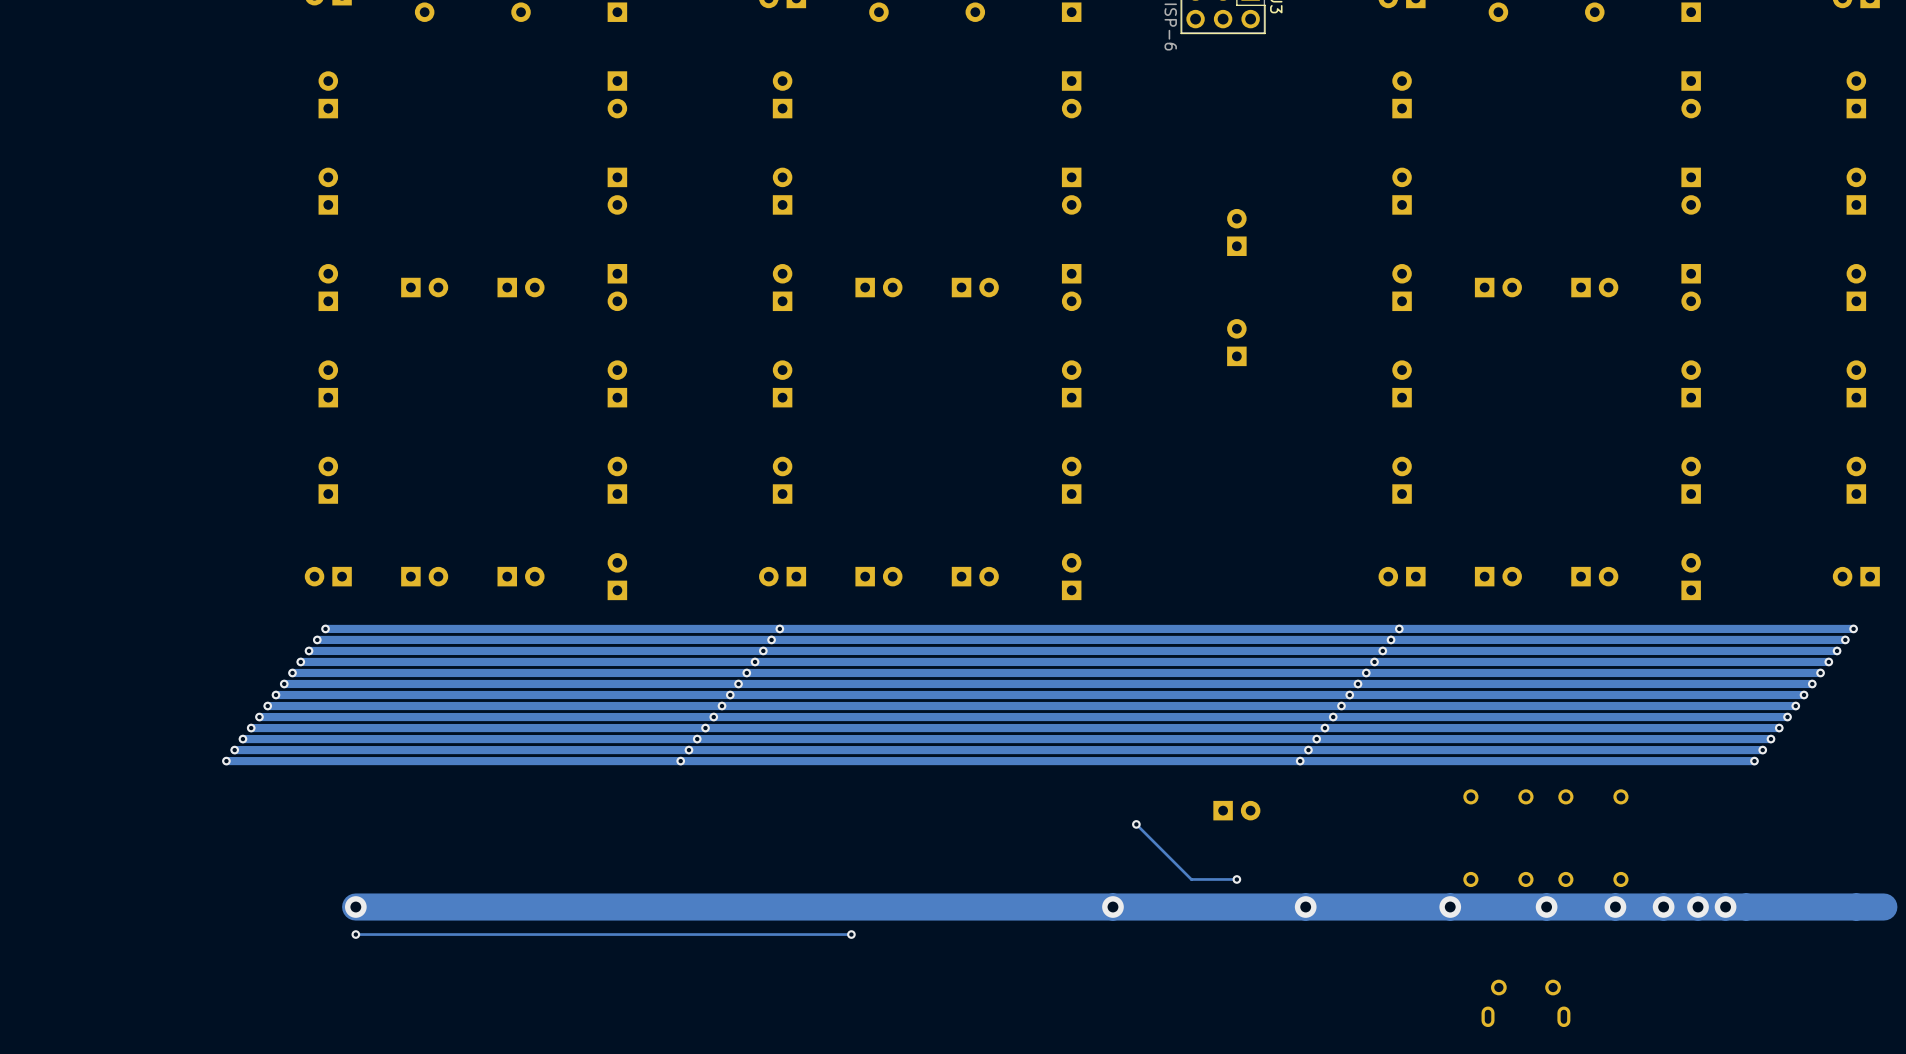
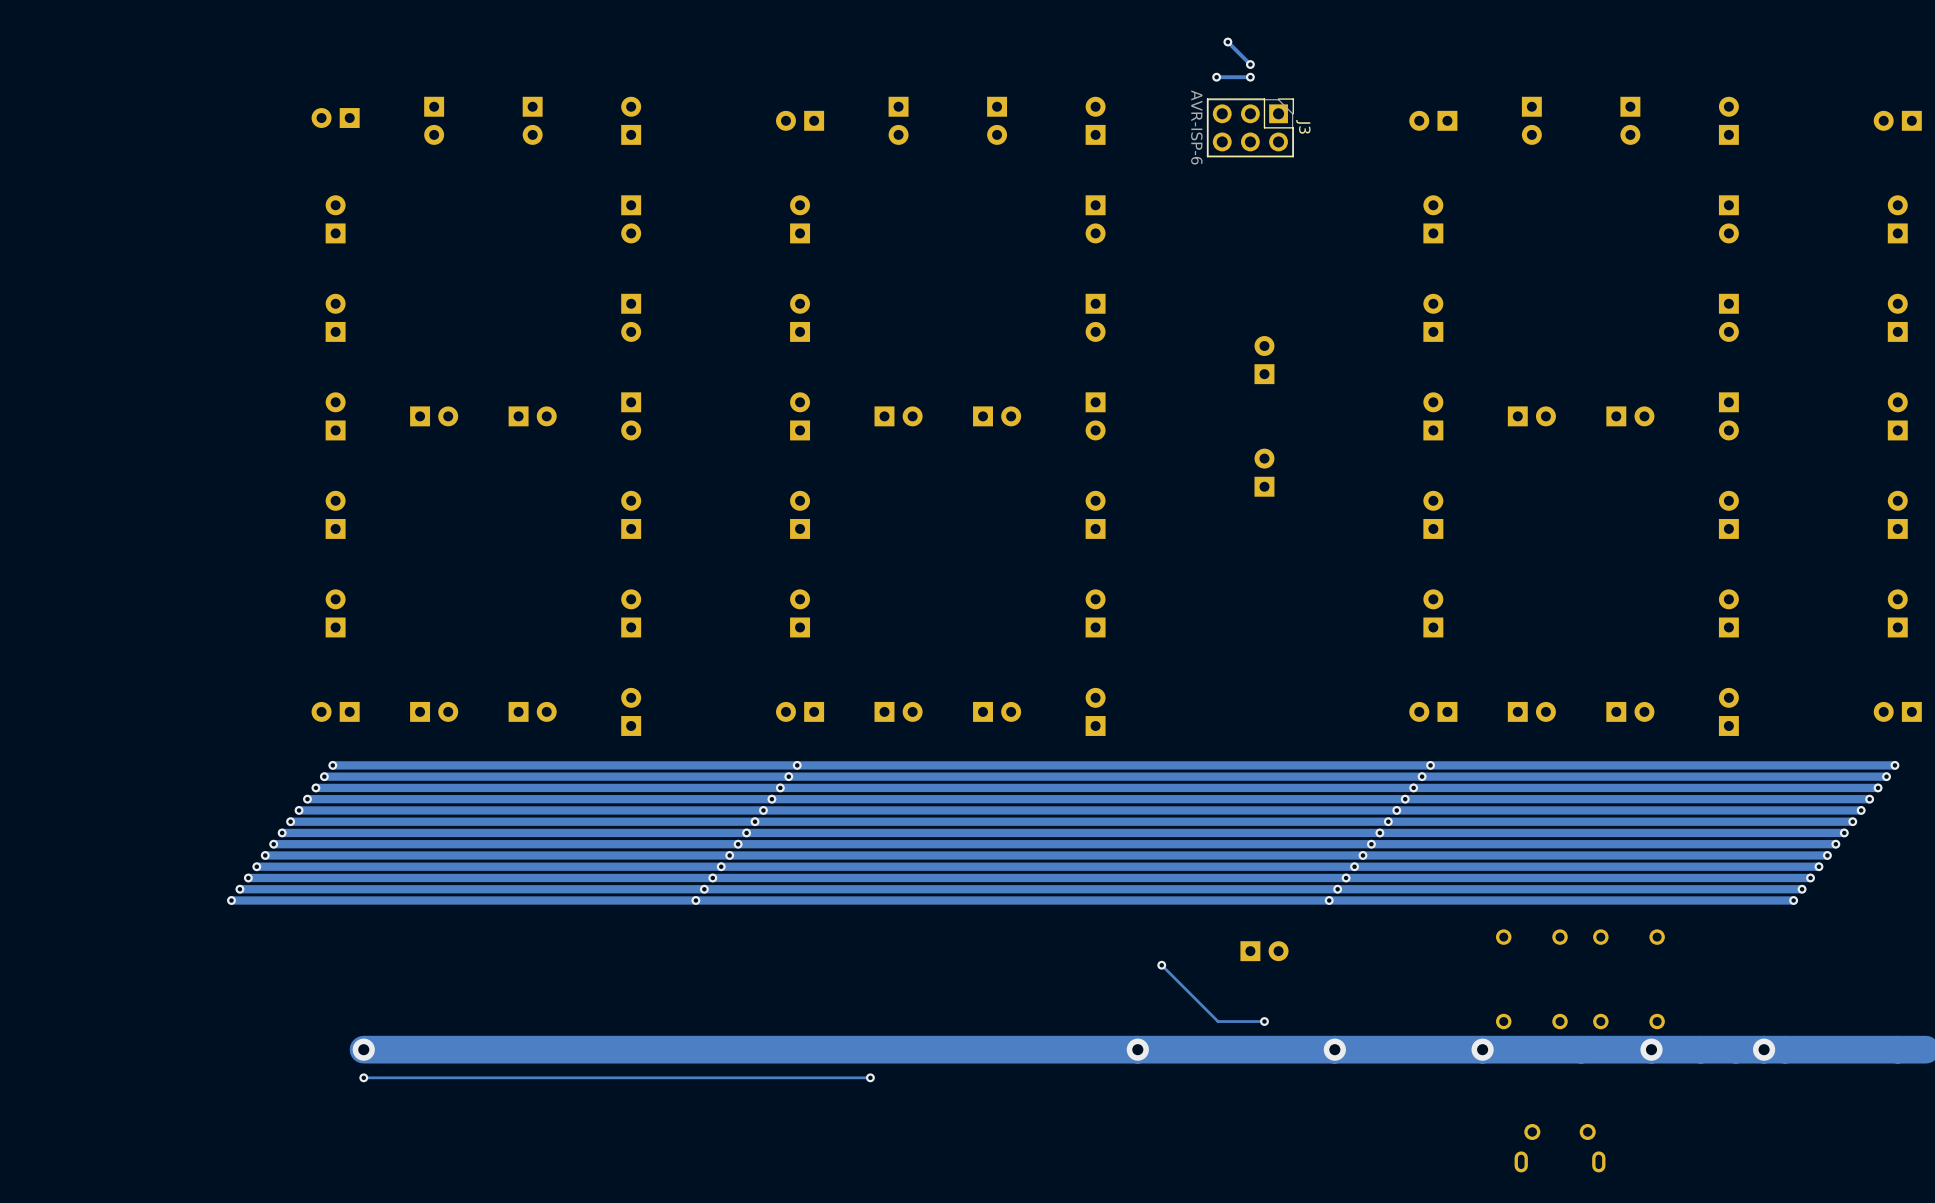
via: (1546, 907) -> none
via: (1663, 907) -> none
via: (1698, 907) -> none

